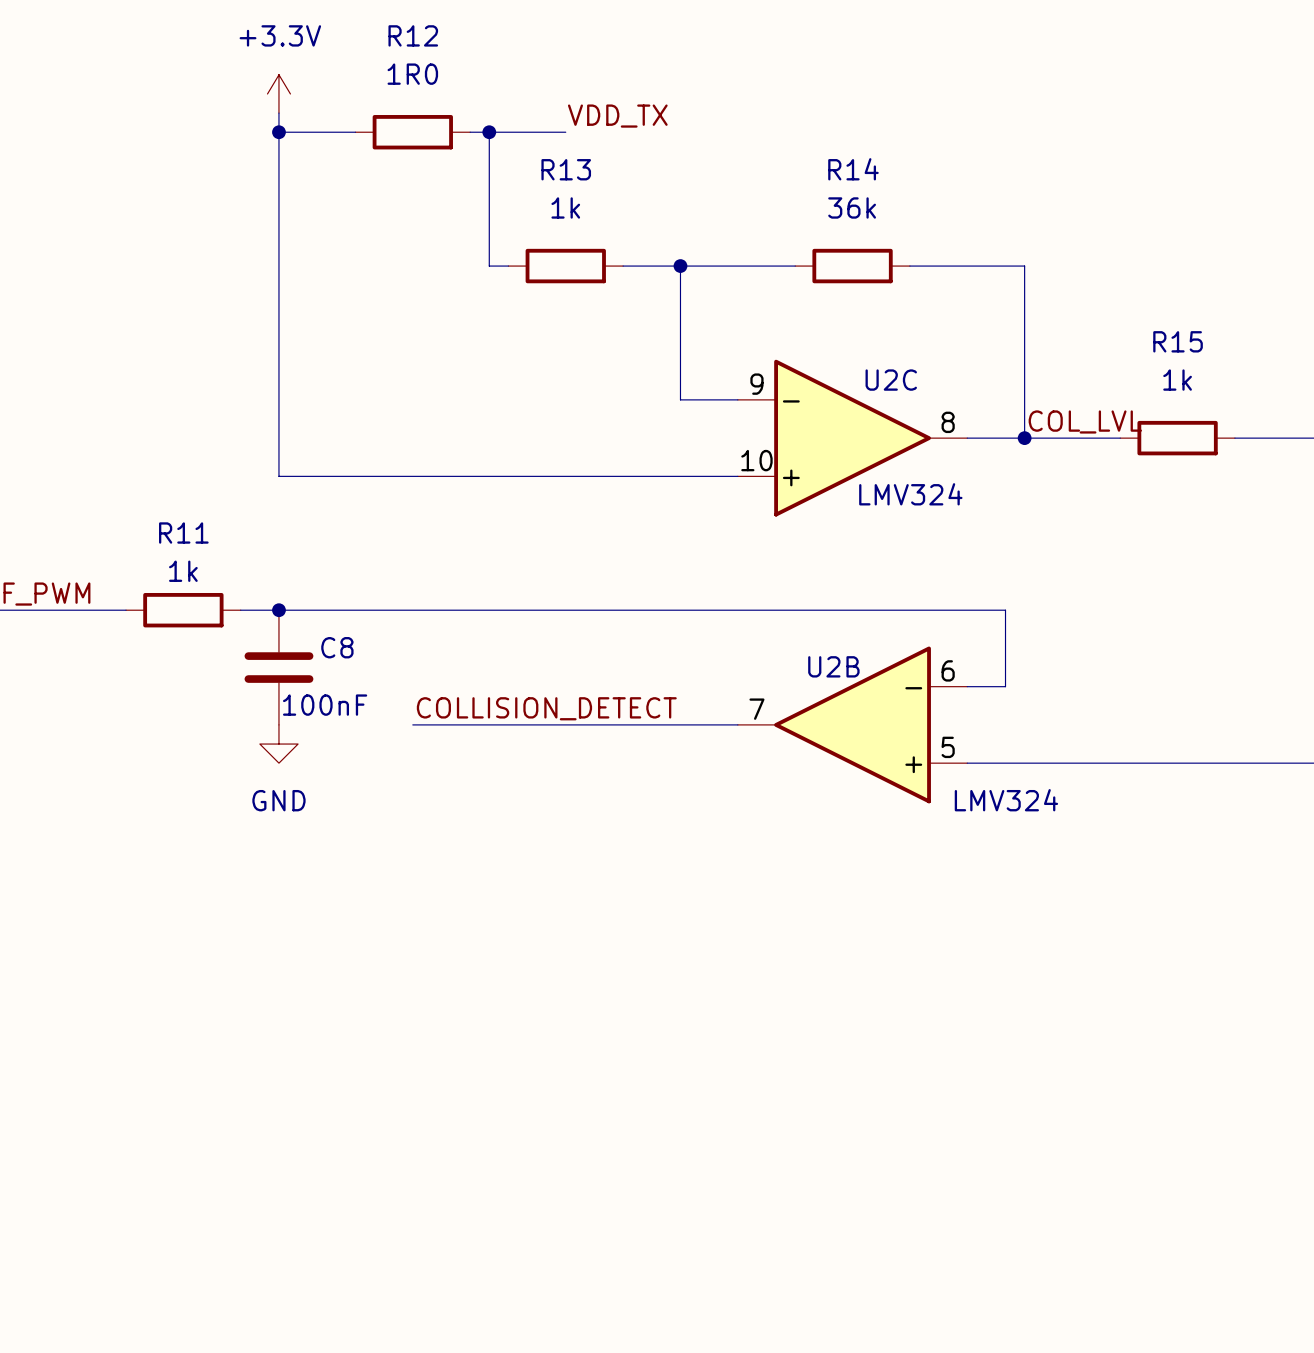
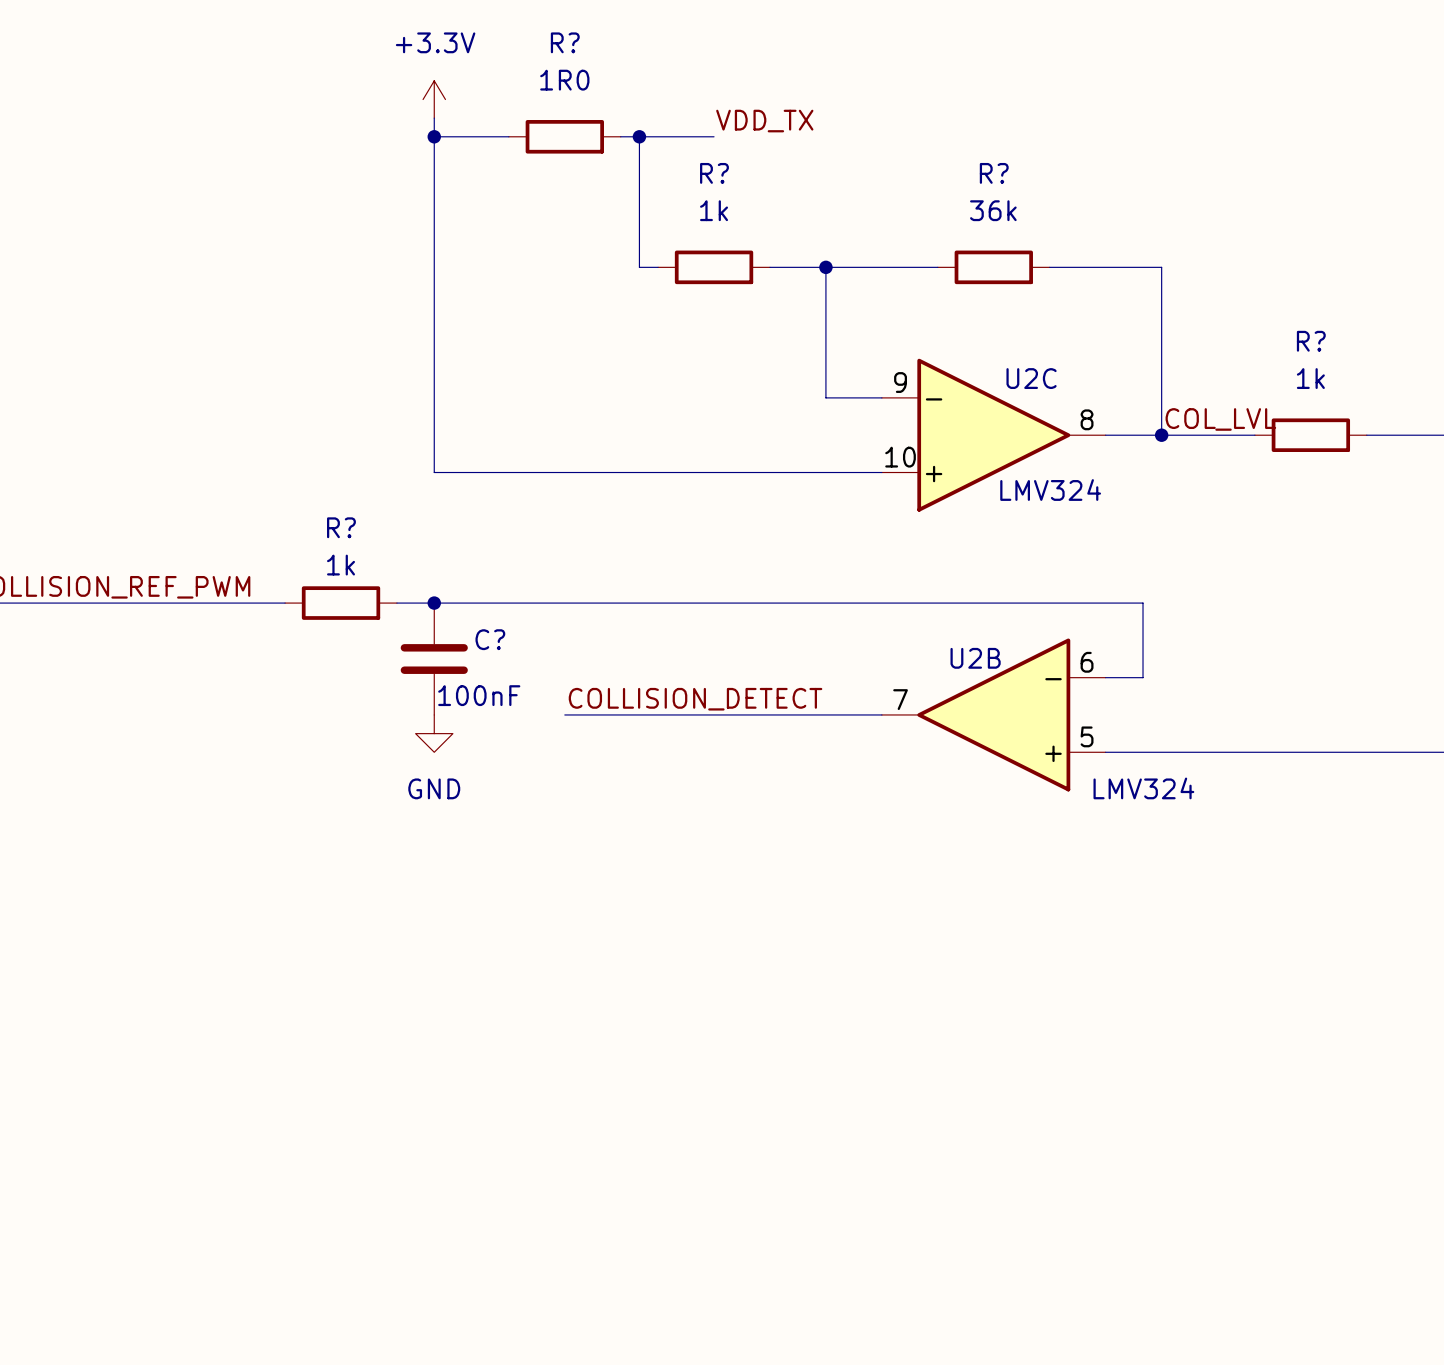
R12 name: R12 (413, 35) -> R? (565, 42)
R13 name: R13 (566, 169) -> R? (714, 173)
R14 name: R14 (853, 169) -> R? (994, 173)
R15 name: R15 (1178, 341) -> R? (1311, 341)
R11 name: R11 (183, 533) -> R? (341, 527)
C8 name: C8 (337, 647) -> C? (490, 639)

